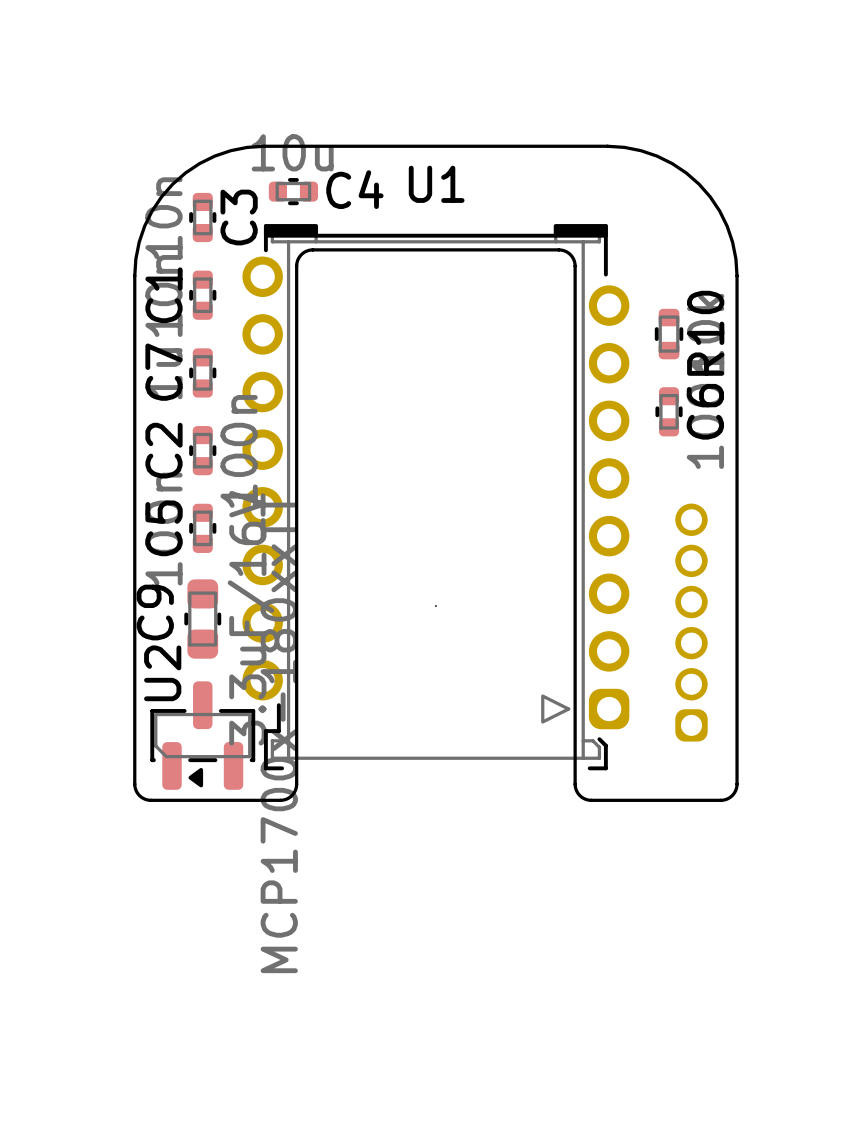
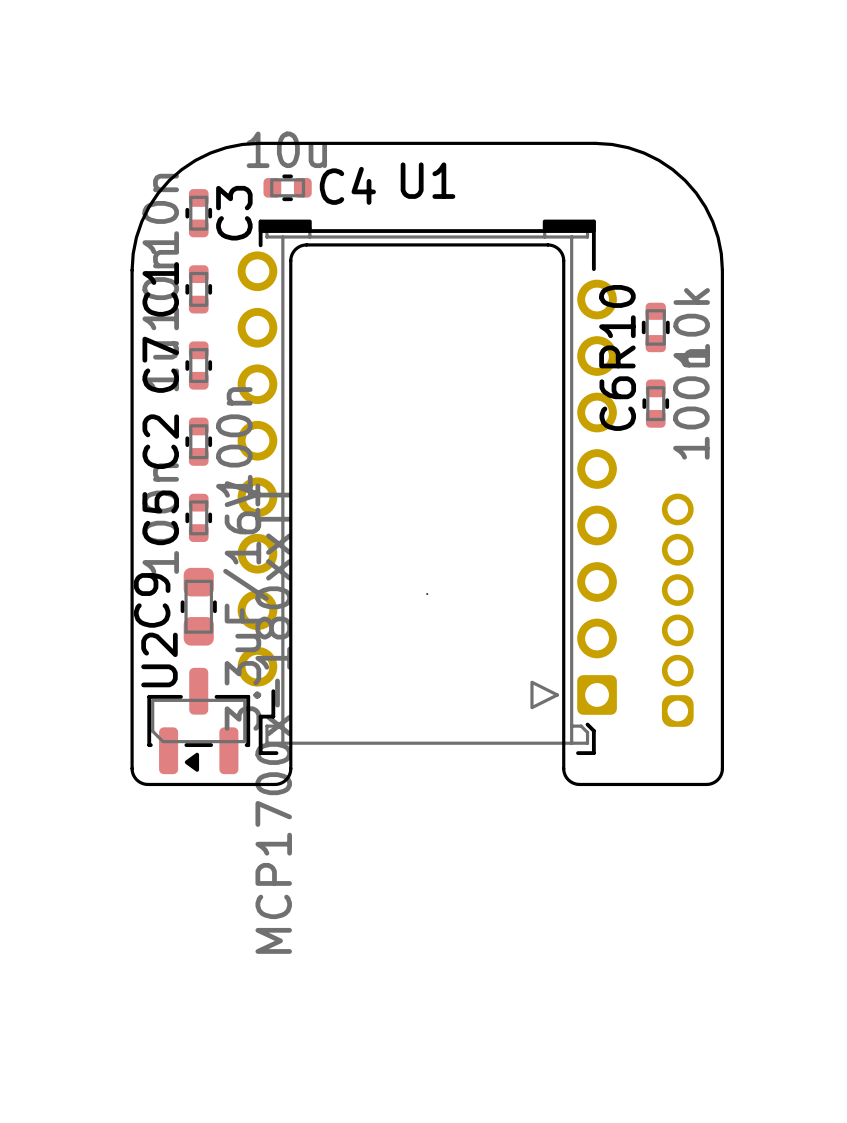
U1 footprint: [242, 224, 630, 771] -> [237, 219, 617, 756]
R10 name position: R10 (705, 333) -> R10 (617, 326)
C6 name position: C6 (705, 411) -> C6 (617, 403)

